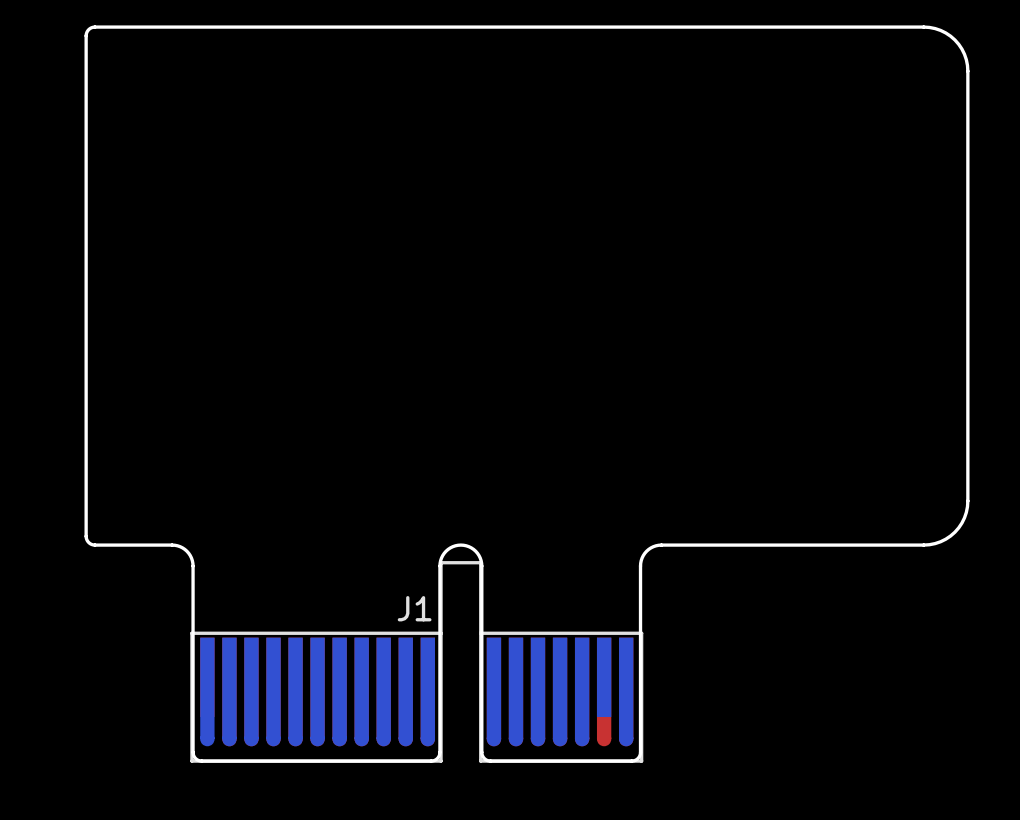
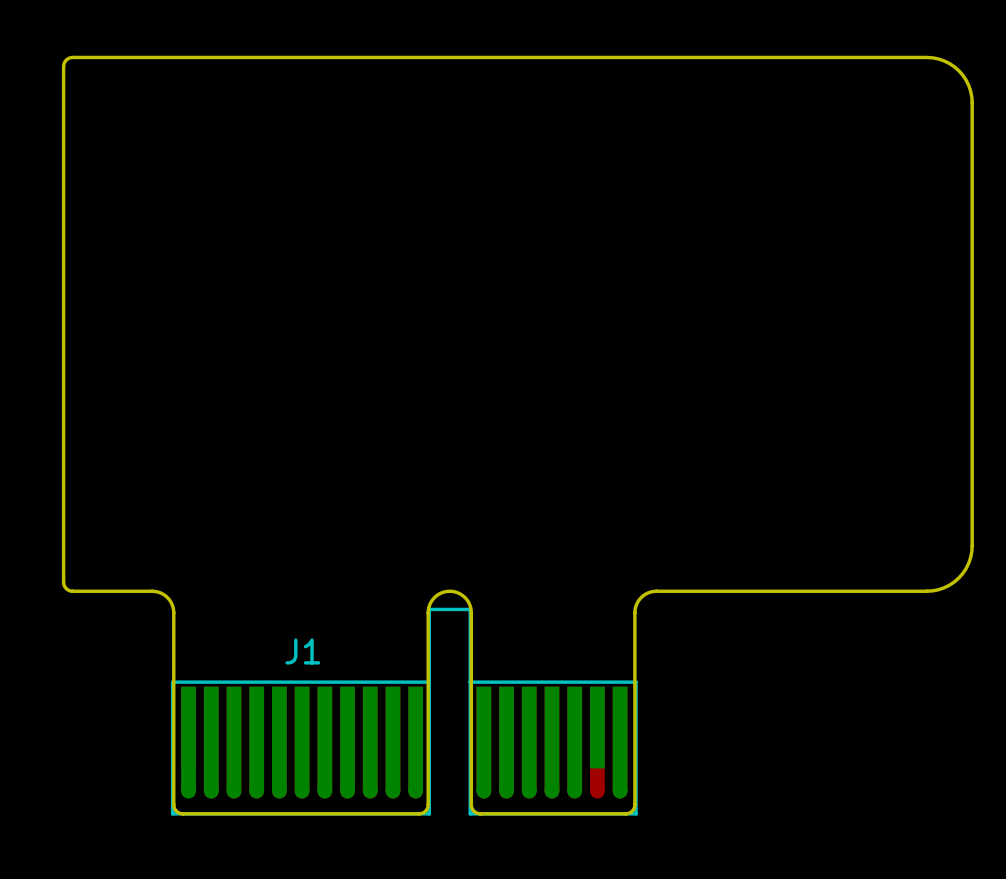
J1 name position: J1 (414, 608) -> J1 (302, 651)

